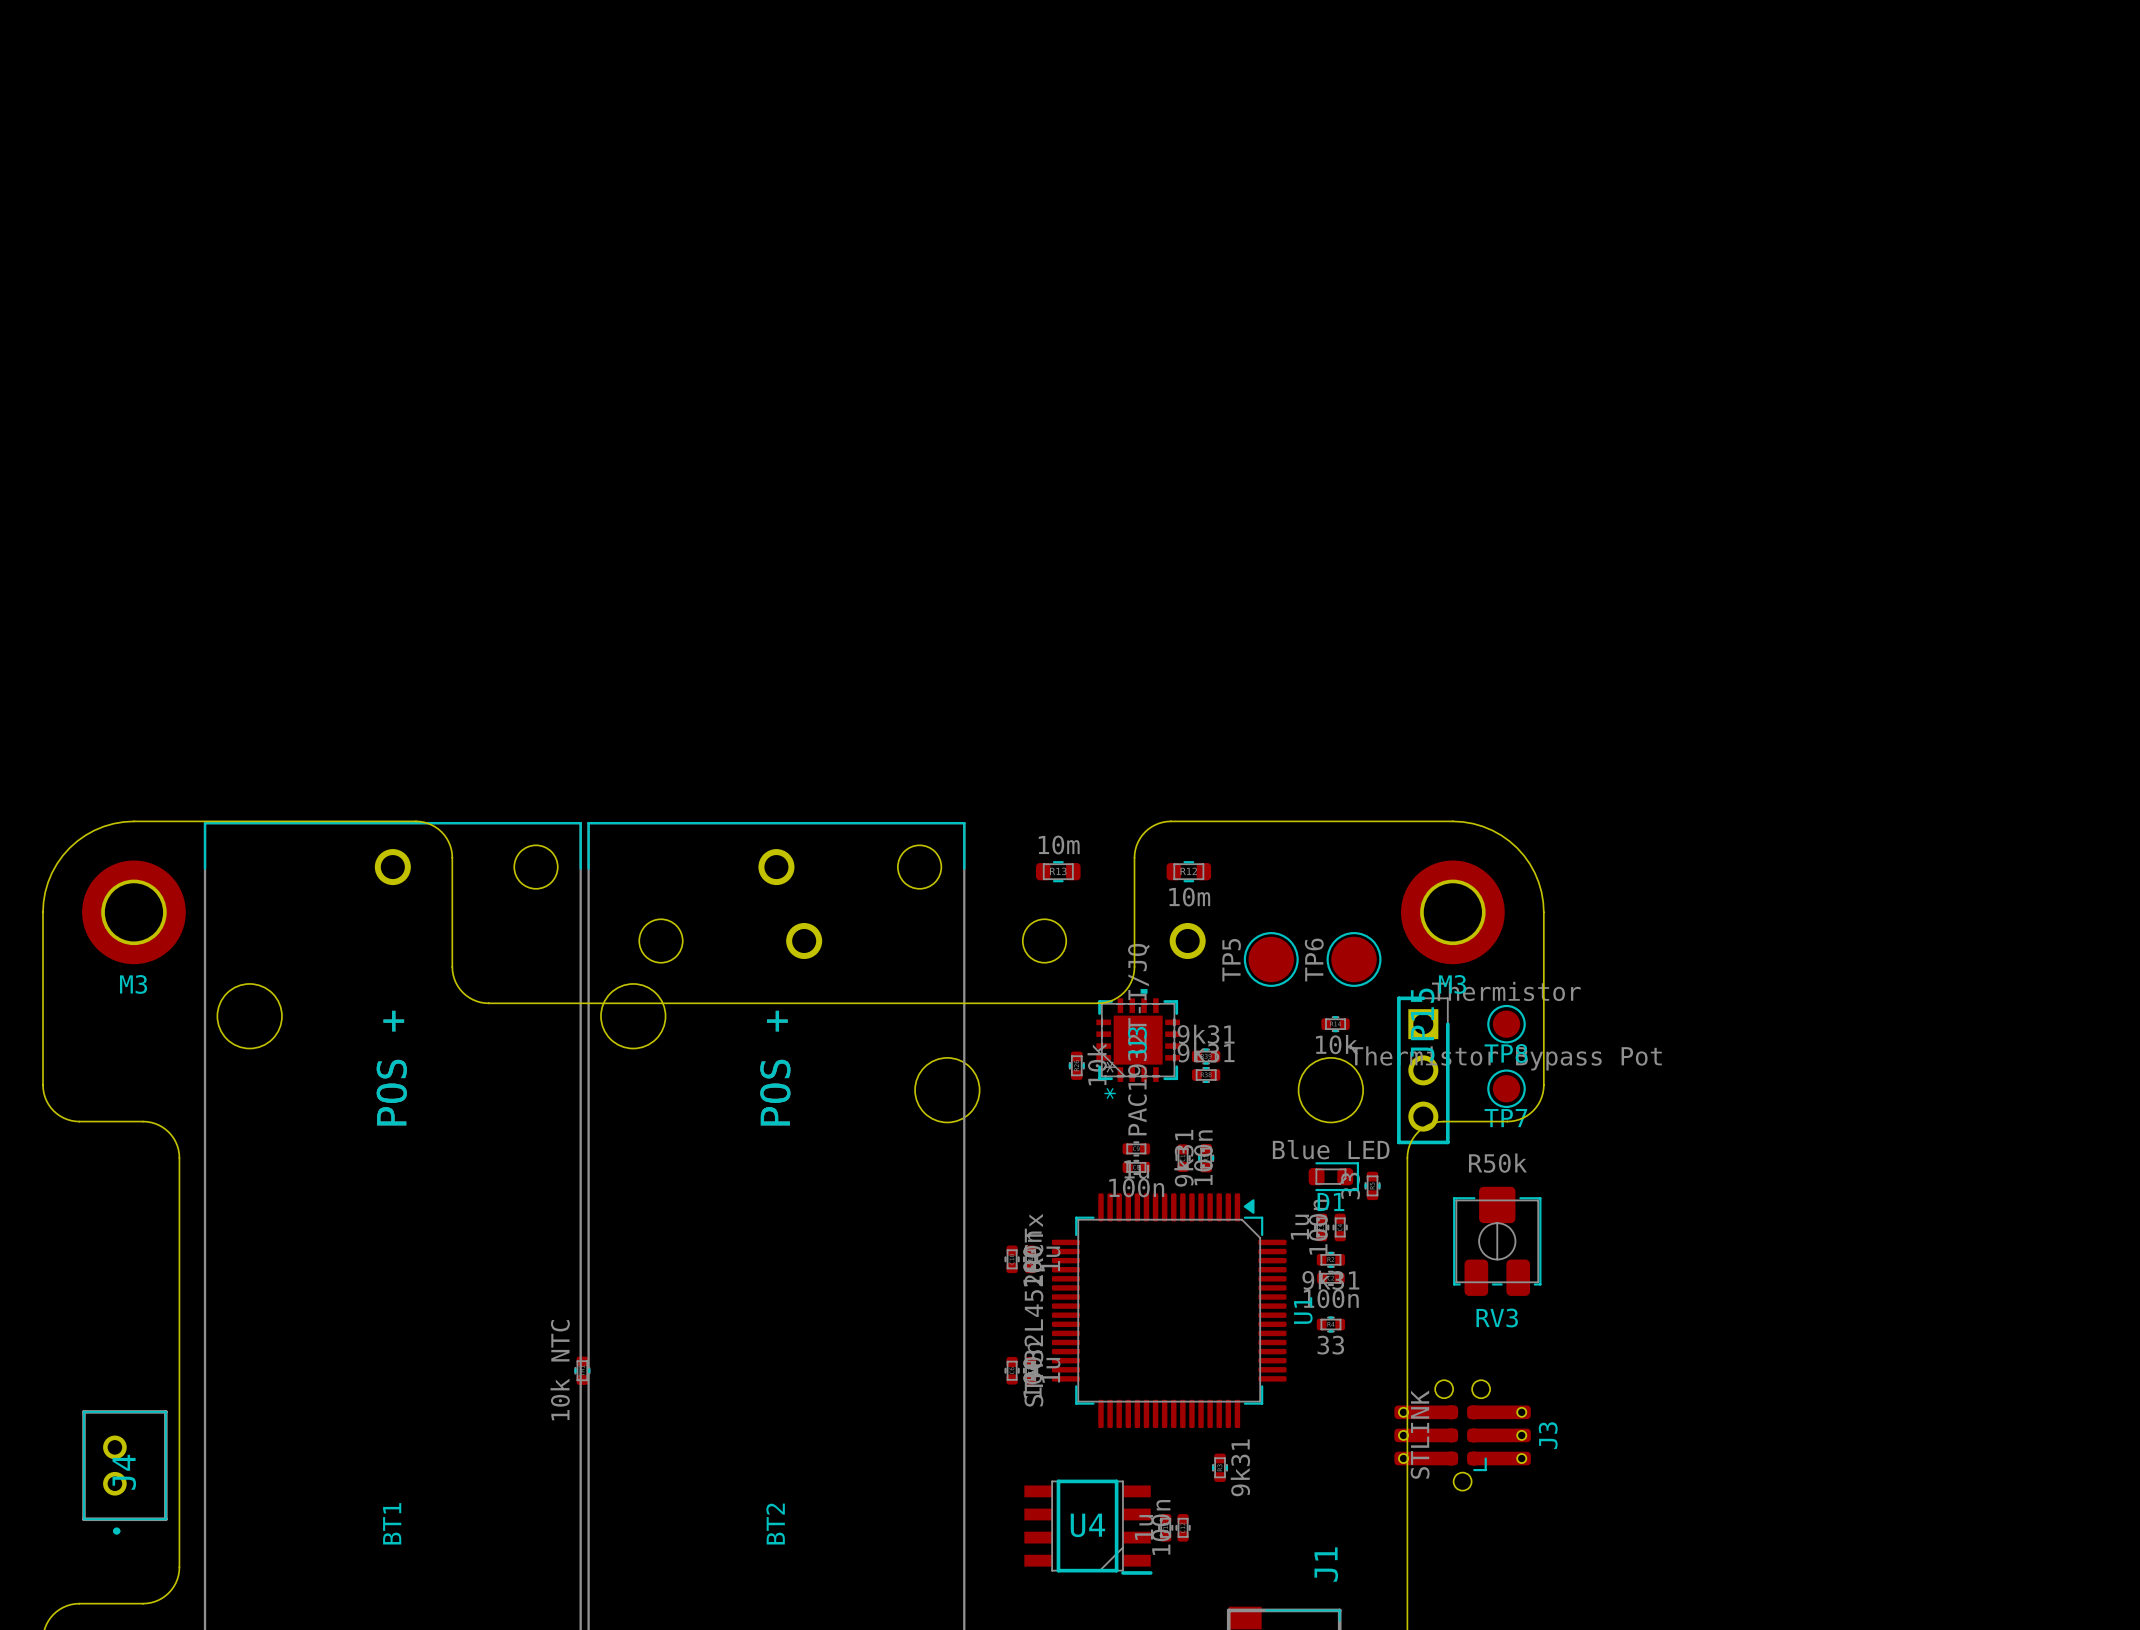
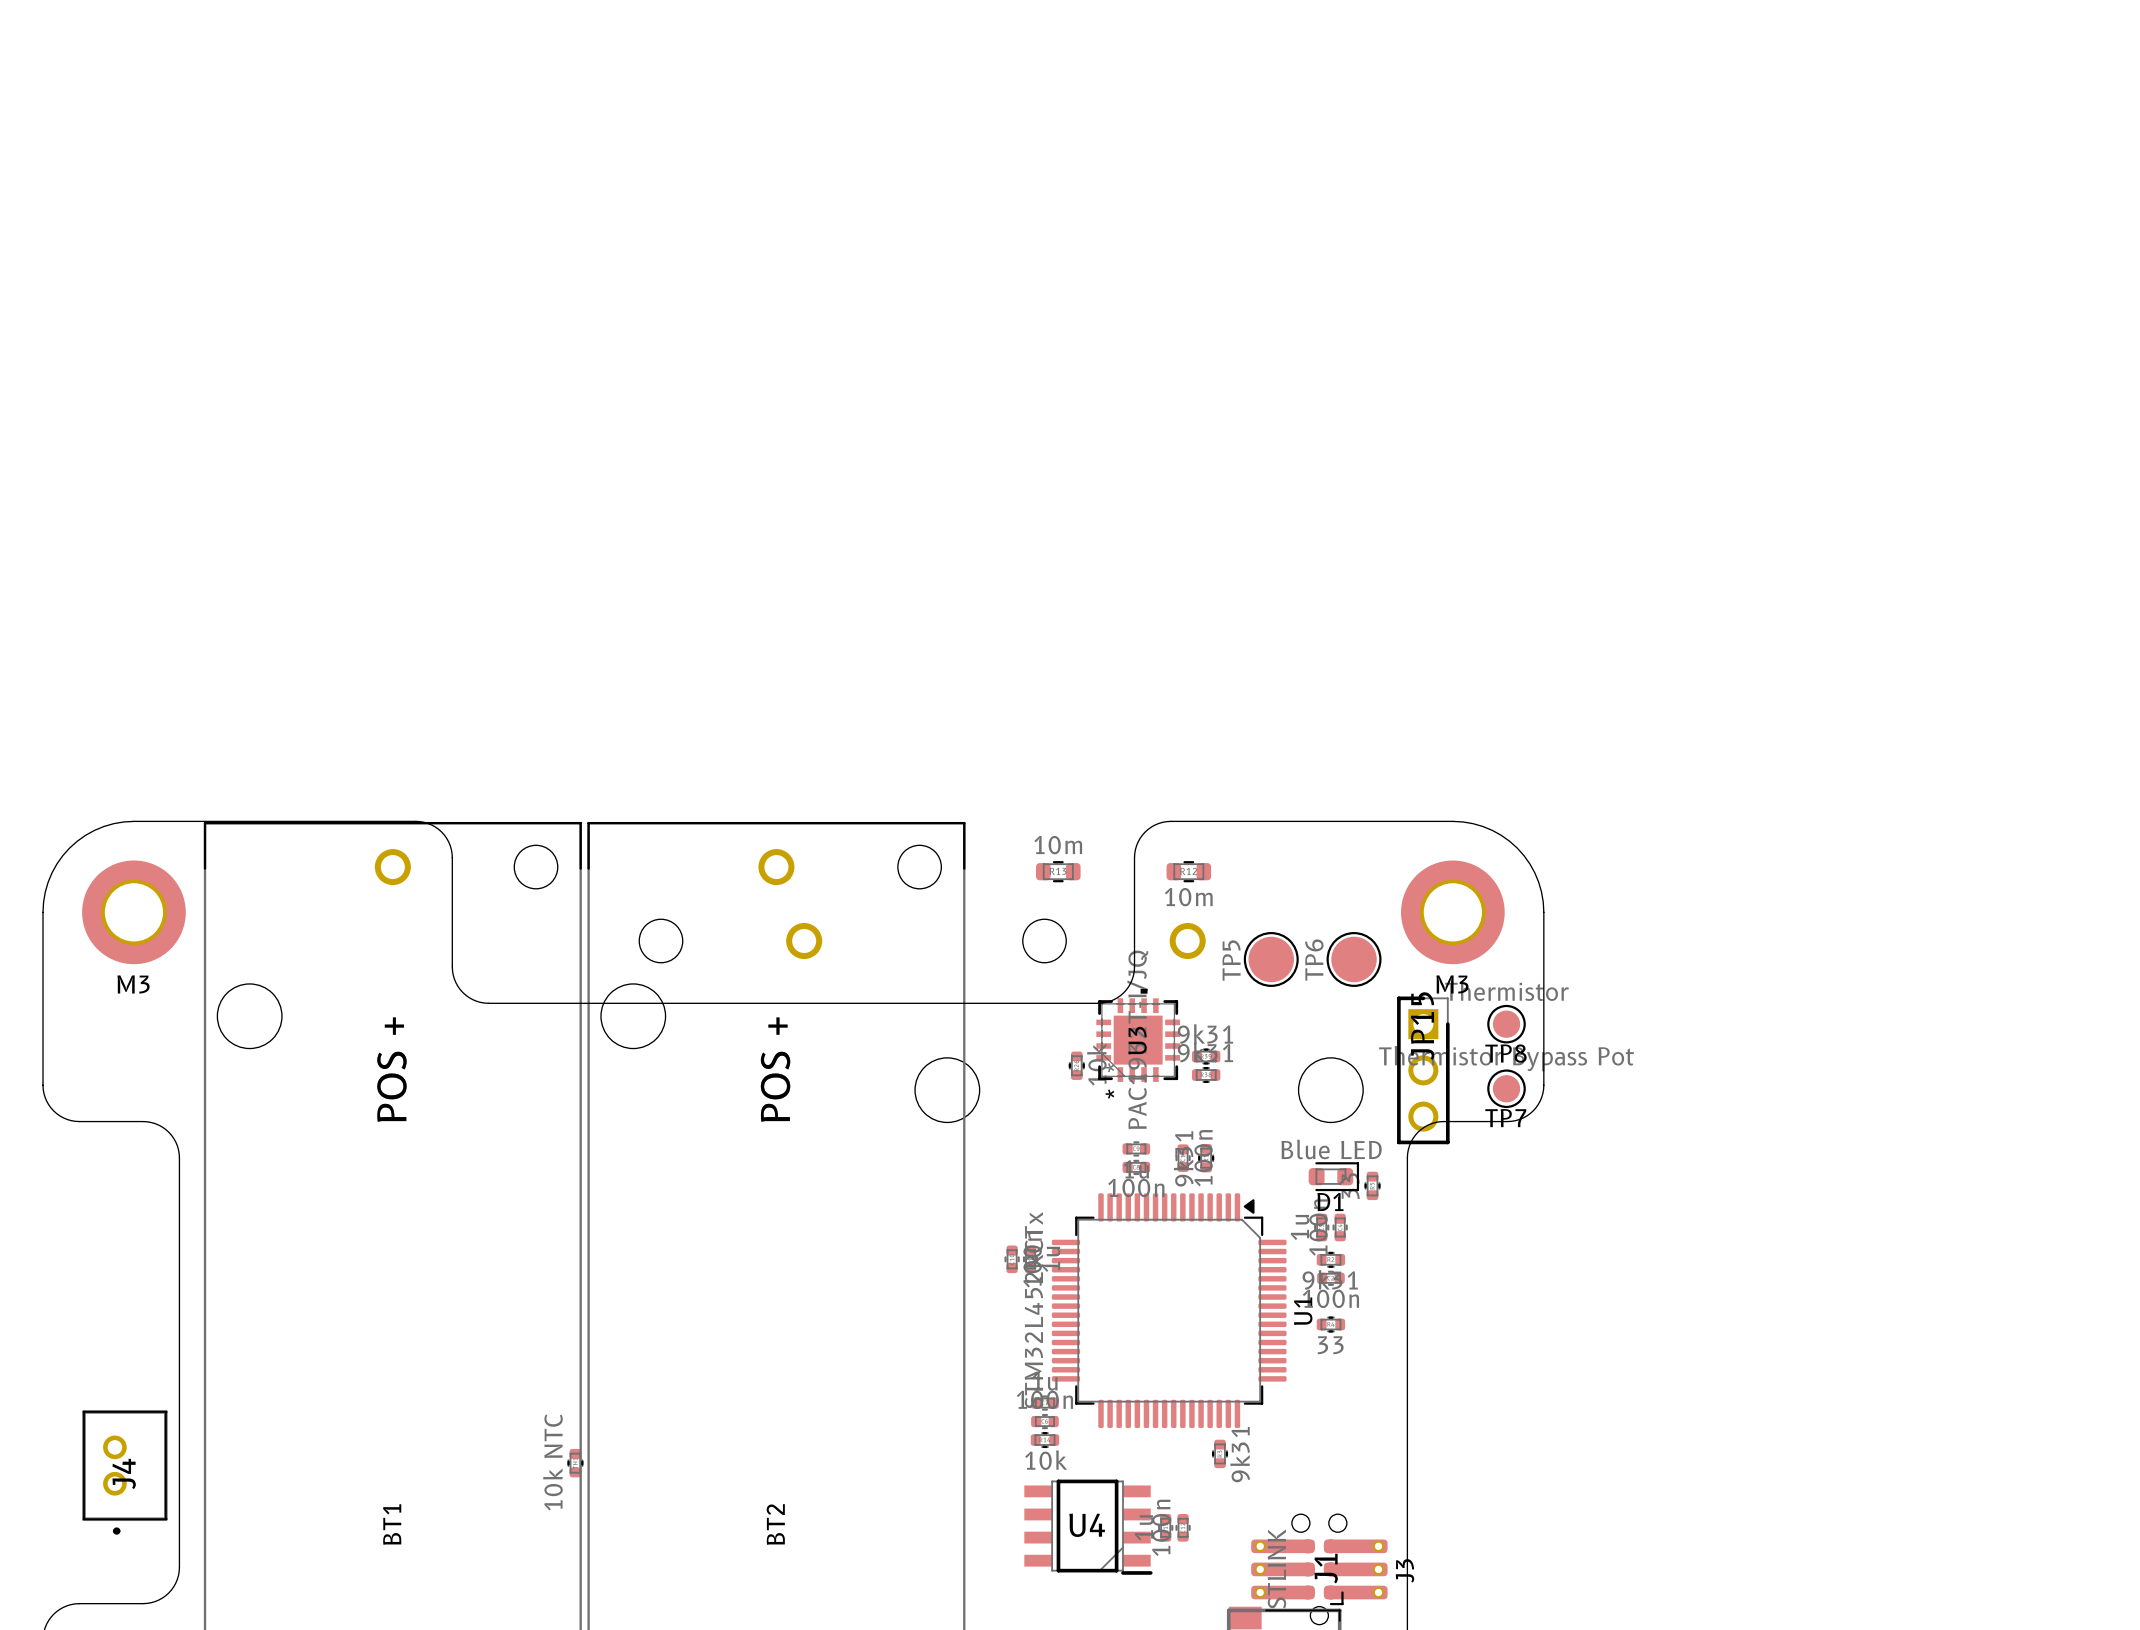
part position: (1335, 1024) -> (1044, 1440)
RV3: R50k (1497, 1241) -> none
part position: (582, 1370) -> (575, 1463)
part rotation: 0° (1012, 1370) -> 90° clockwise (1044, 1421)
part position: (1012, 1370) -> (1044, 1421)
part rotation: 0° (1030, 1370) -> 90° clockwise (1044, 1403)
part position: (1030, 1370) -> (1044, 1403)
J3 position: (1462, 1435) -> (1319, 1569)
part position: (1220, 1467) -> (1220, 1453)

